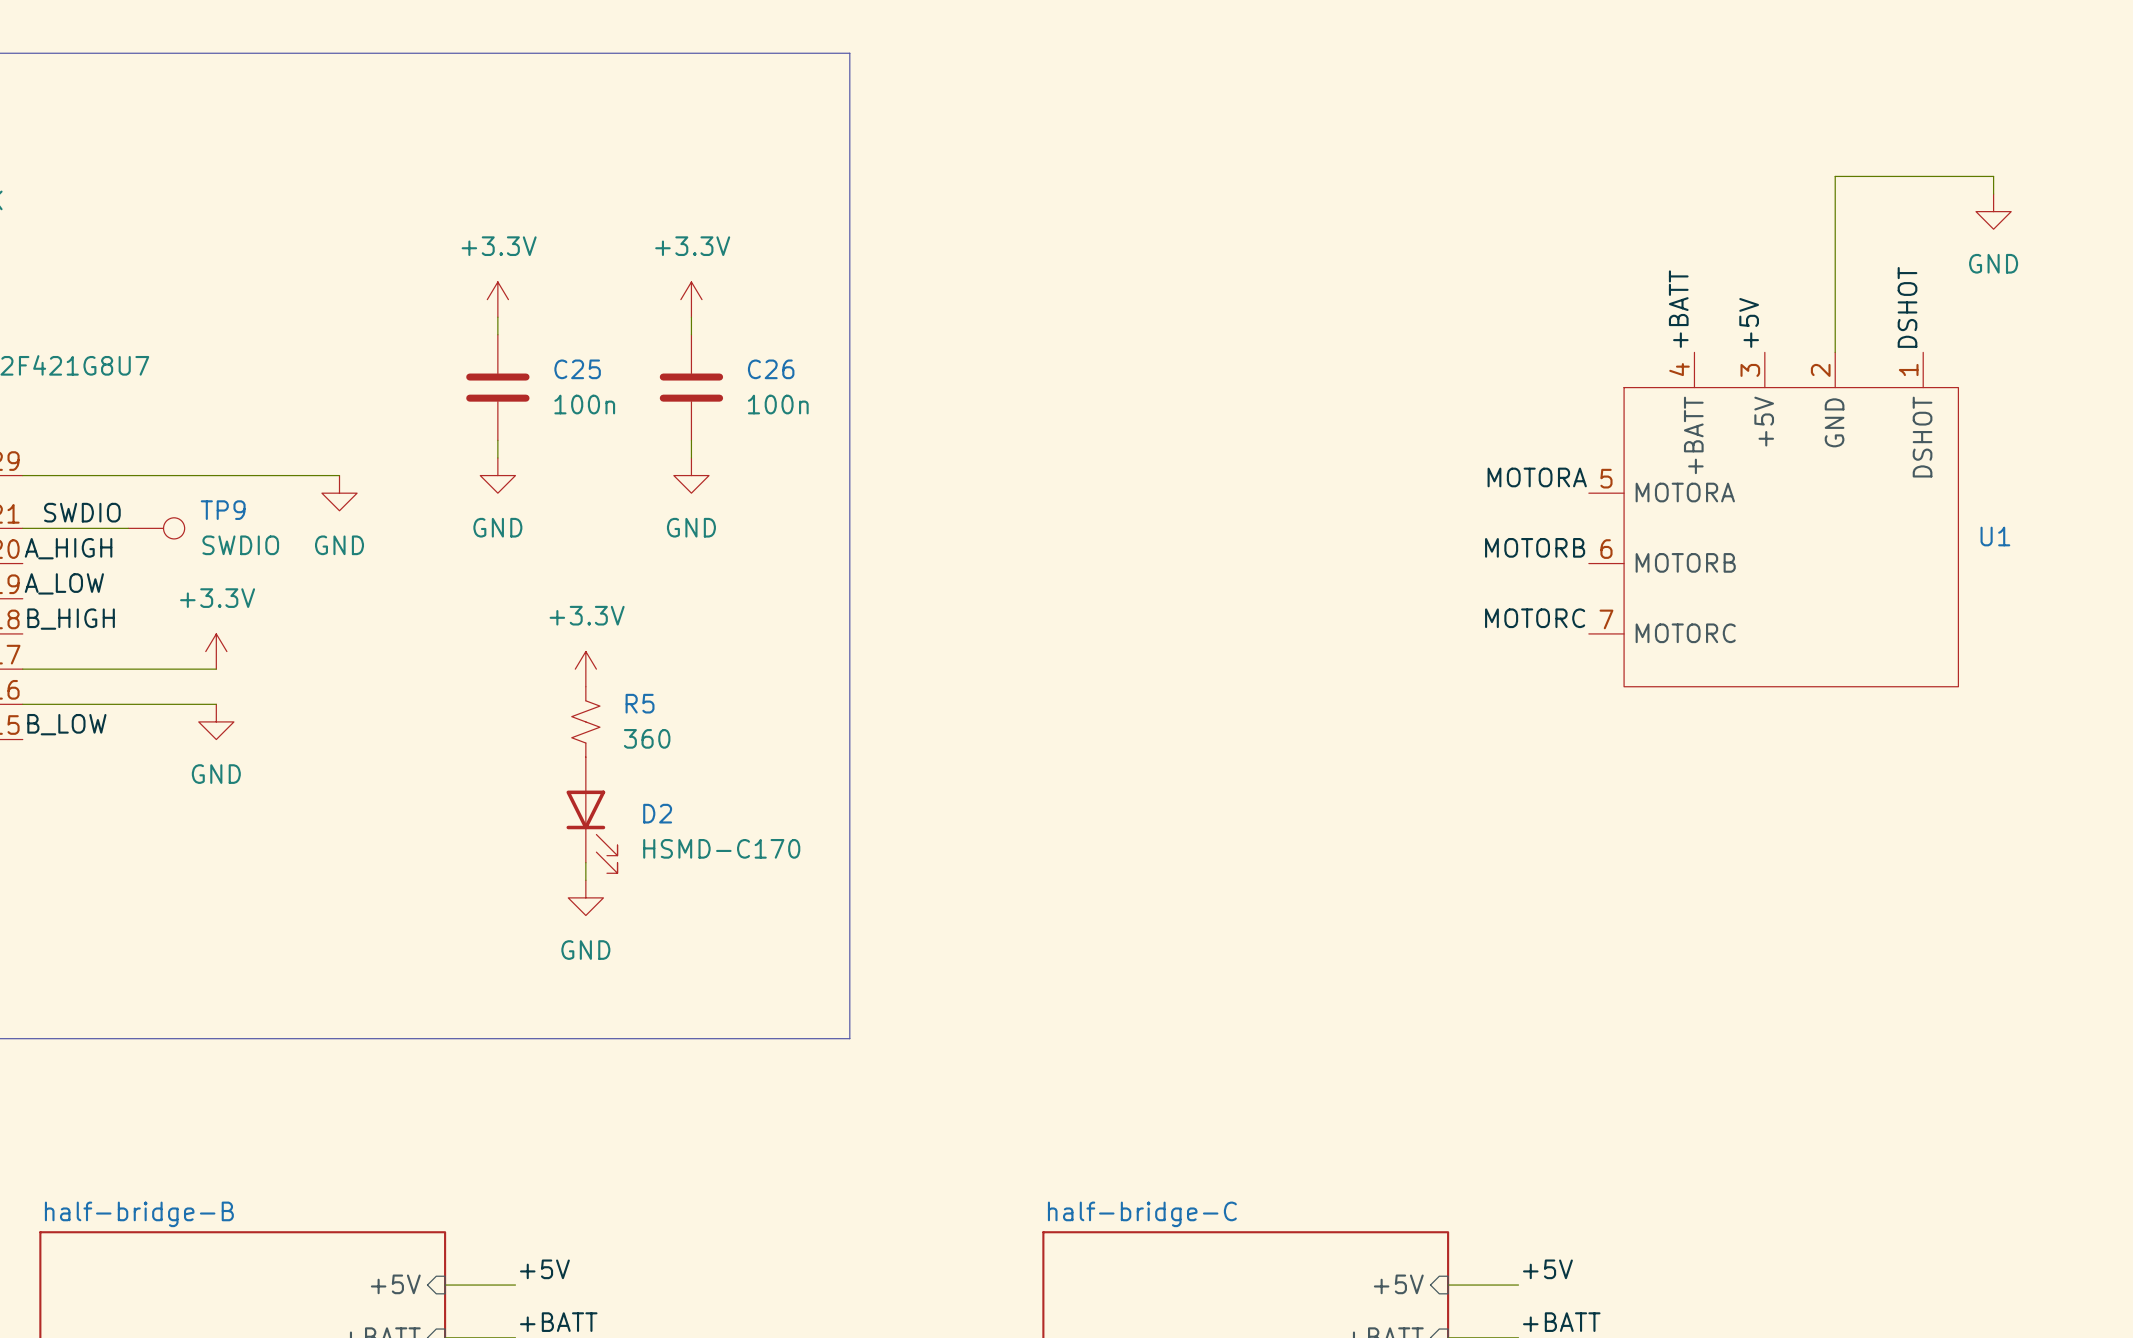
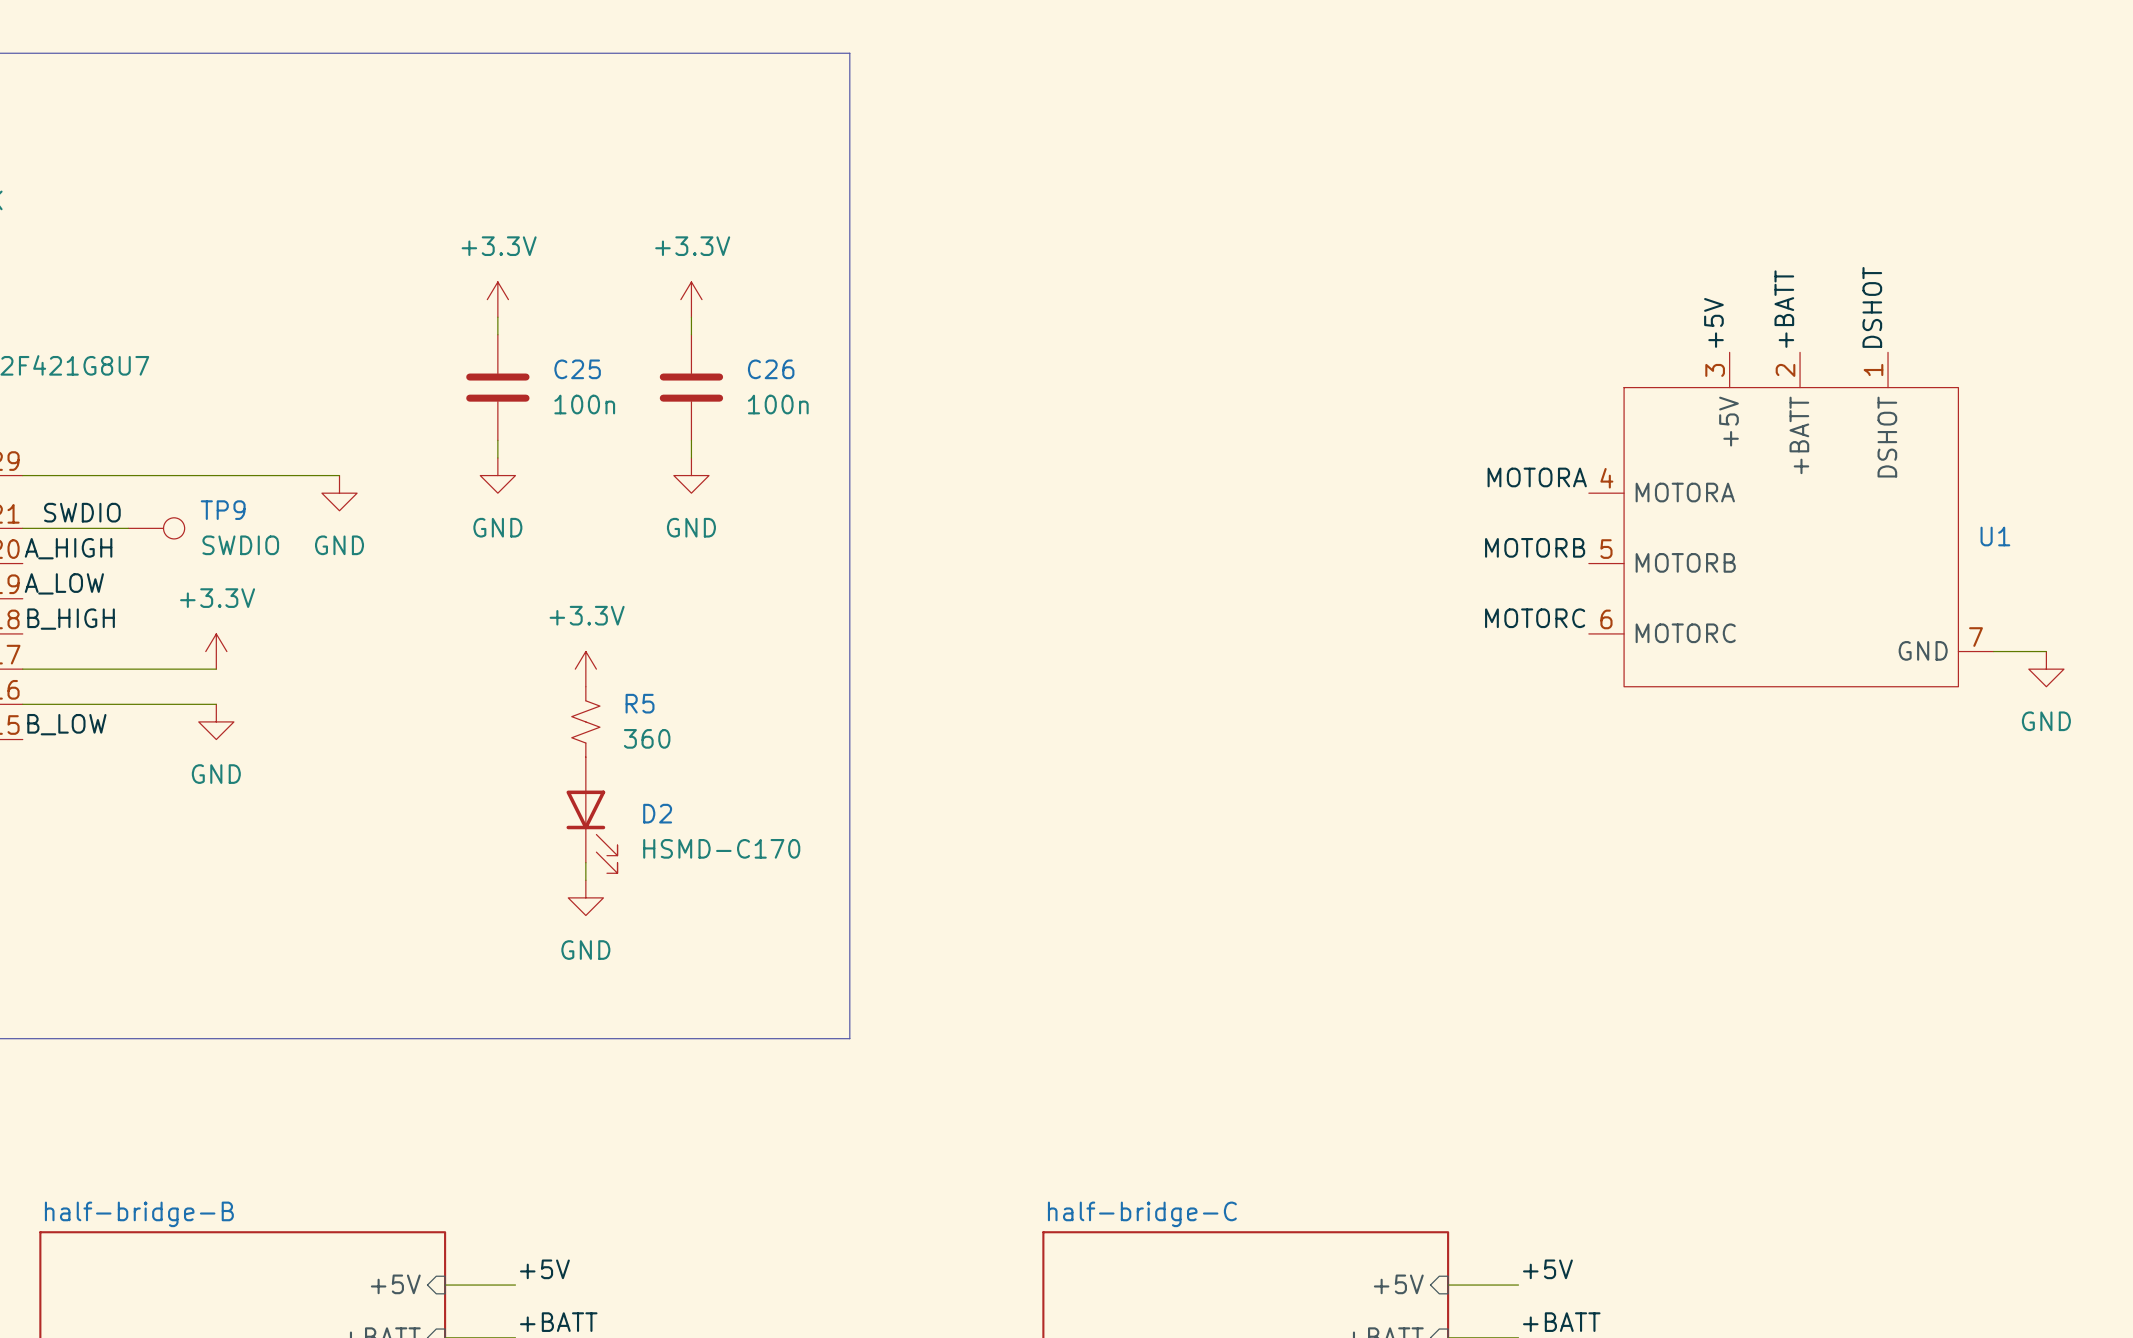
wire: (1993, 194) (1993, 176) (1835, 176) (1835, 352) -> none
power symbol: GND (1993, 211) -> none
label position: DSHOT (1907, 307) -> DSHOT (1872, 307)
label position: +BATT (1678, 309) -> +BATT (1784, 309)
label position: +5V (1749, 322) -> +5V (1713, 322)
U1 symbol: [1588, 352, 1959, 687] -> [1588, 352, 1994, 687]
wire: none -> (1993, 651) (2046, 651)
power symbol: none -> GND (2046, 669)

